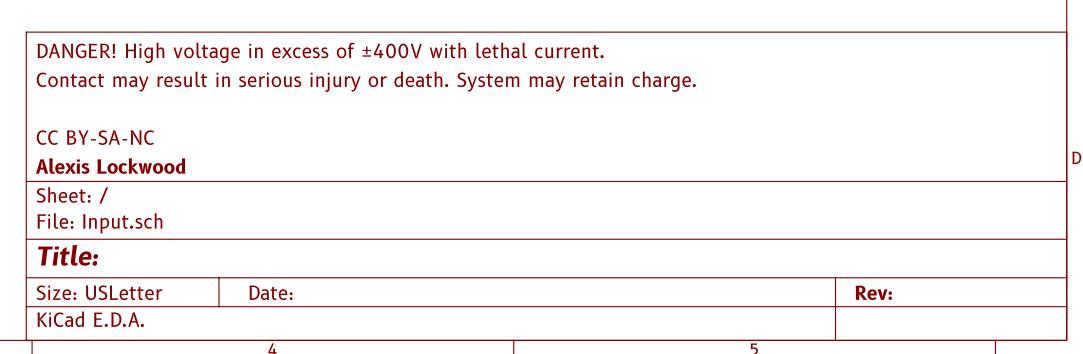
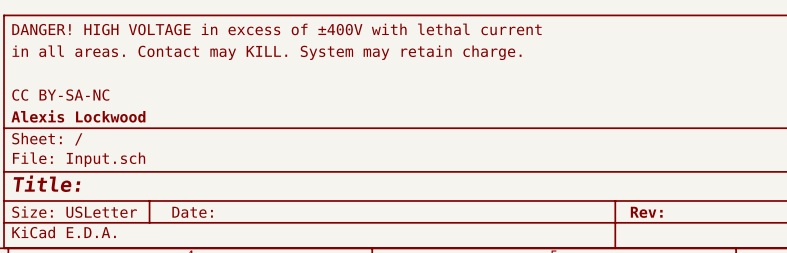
title block: DANGER! High voltage in excess of ±400V with lethal current. (320, 52) -> DANGER! HIGH VOLTAGE in excess of ±400V with lethal current (276, 29)
title block: Contact may result in serious injury or death. System may retain charge. (366, 81) -> in all areas. Contact may KILL. System may retain charge. (267, 52)

